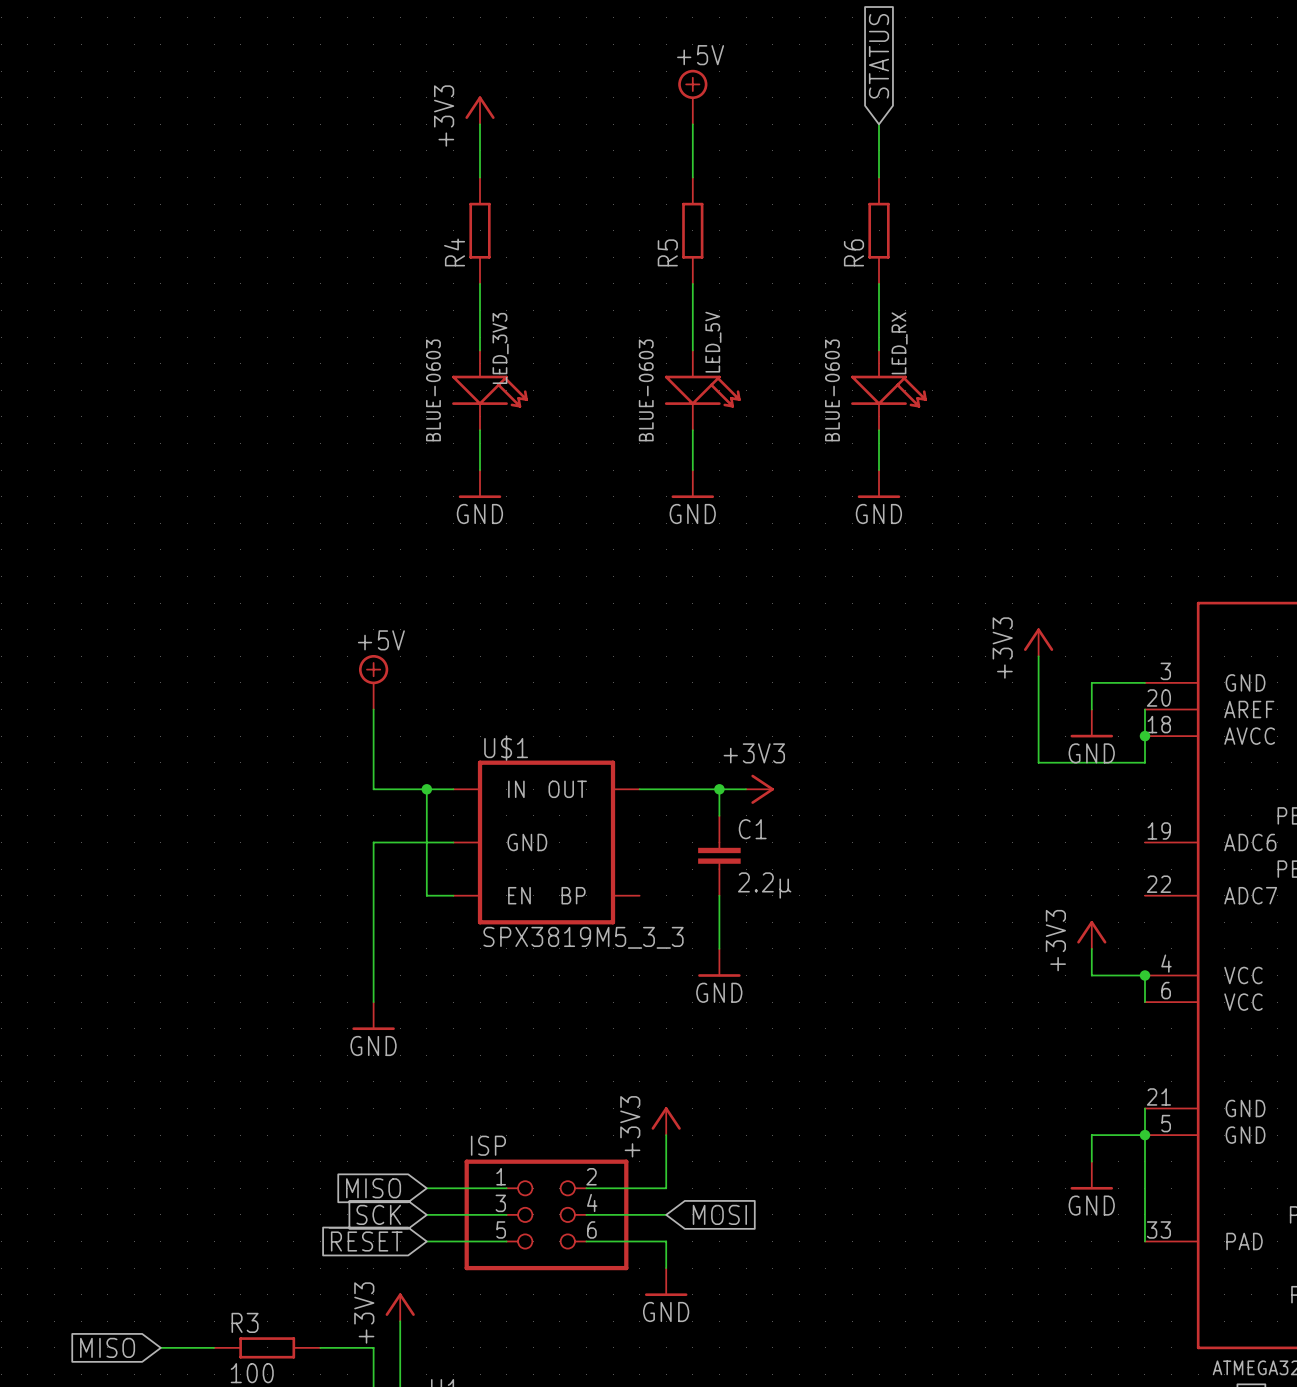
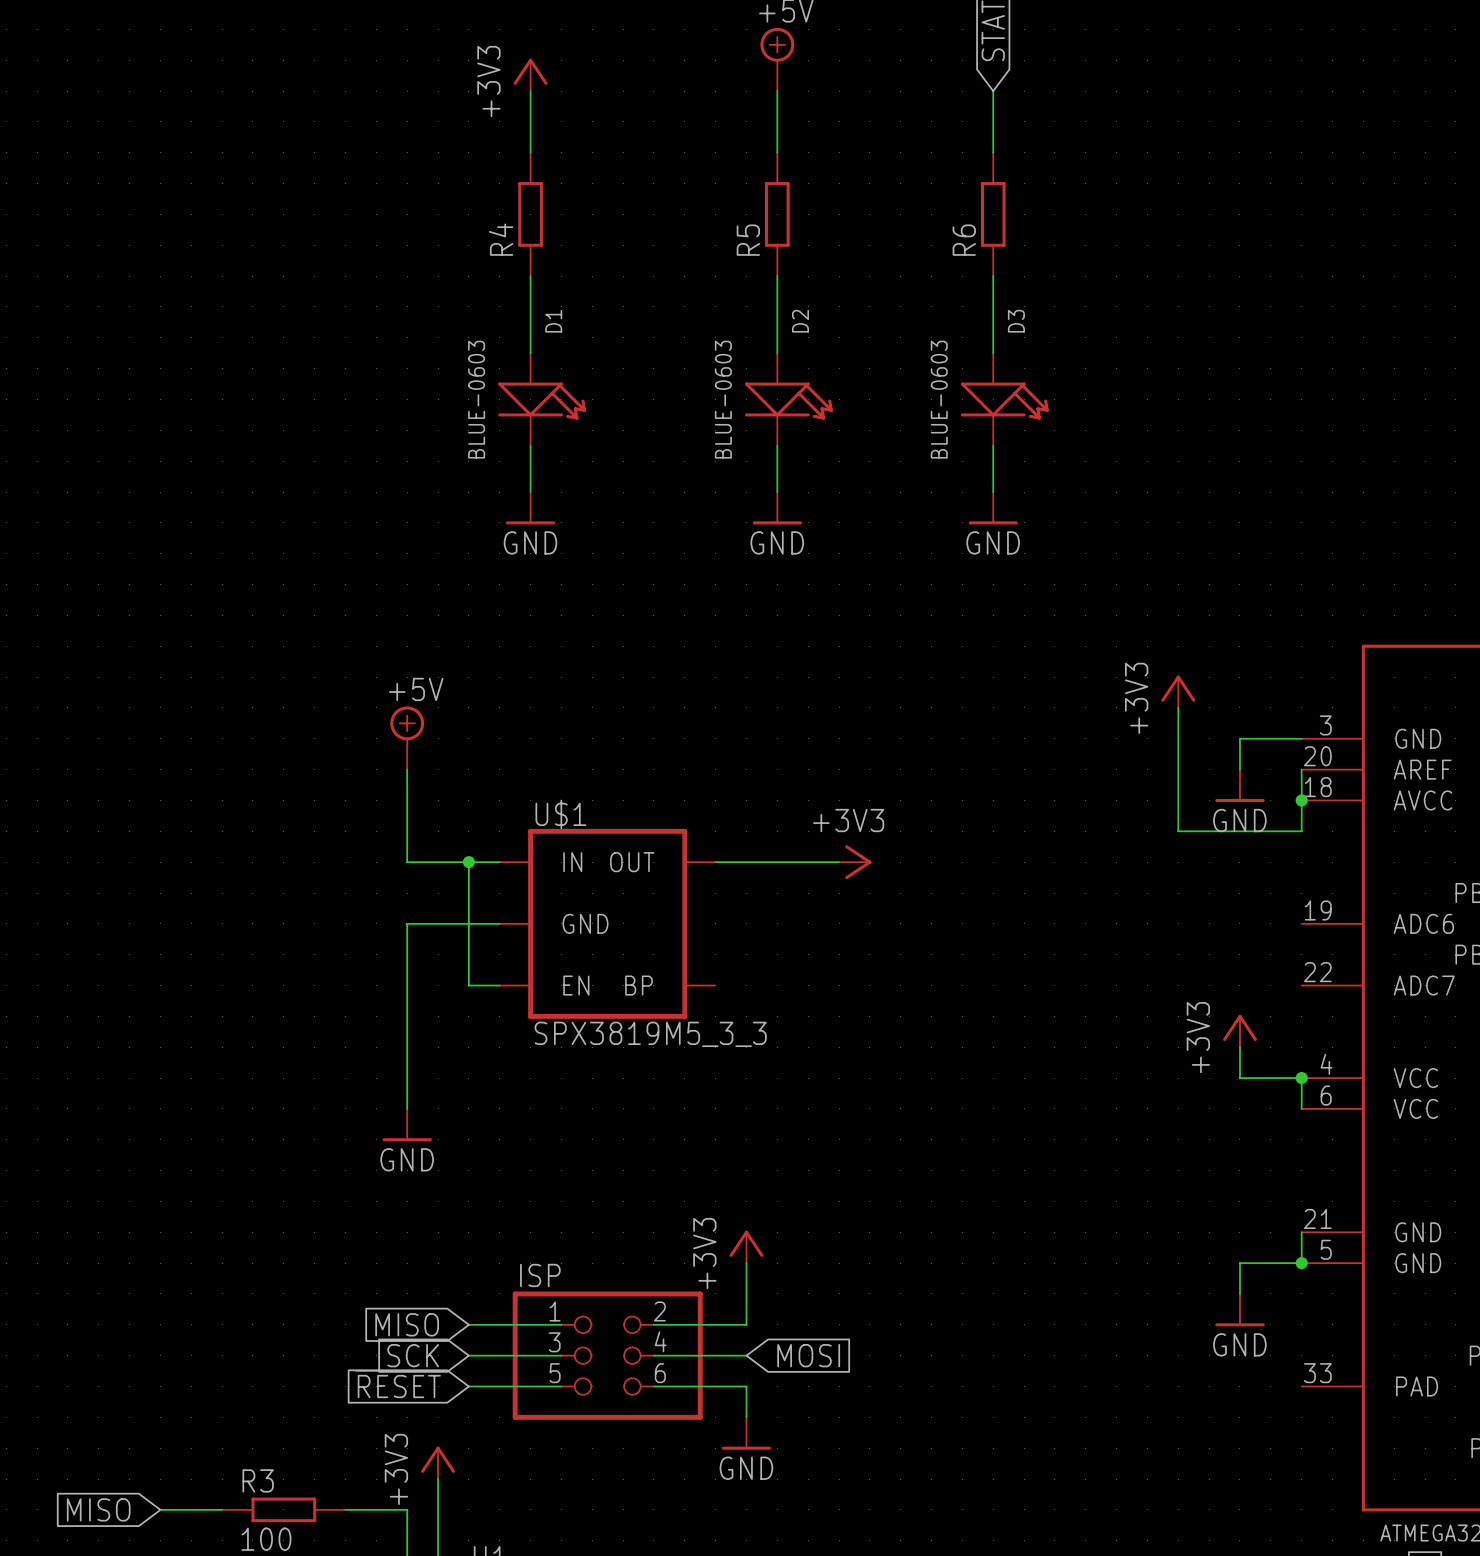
LED_5V name: LED_5V (713, 342) -> D2 (800, 321)
LED_RX name: LED_RX (899, 343) -> D3 (1016, 321)
LED_3V3 name: LED_3V3 (500, 348) -> D1 (553, 321)
wire: (719, 789) (719, 815) -> none
junction: (719, 789) -> none
C1: 2.2µ (719, 855) -> none
wire: (719, 895) (719, 948) -> none
power symbol: GND (719, 962) -> none
wire: (1144, 1135) (1144, 1241) -> none

